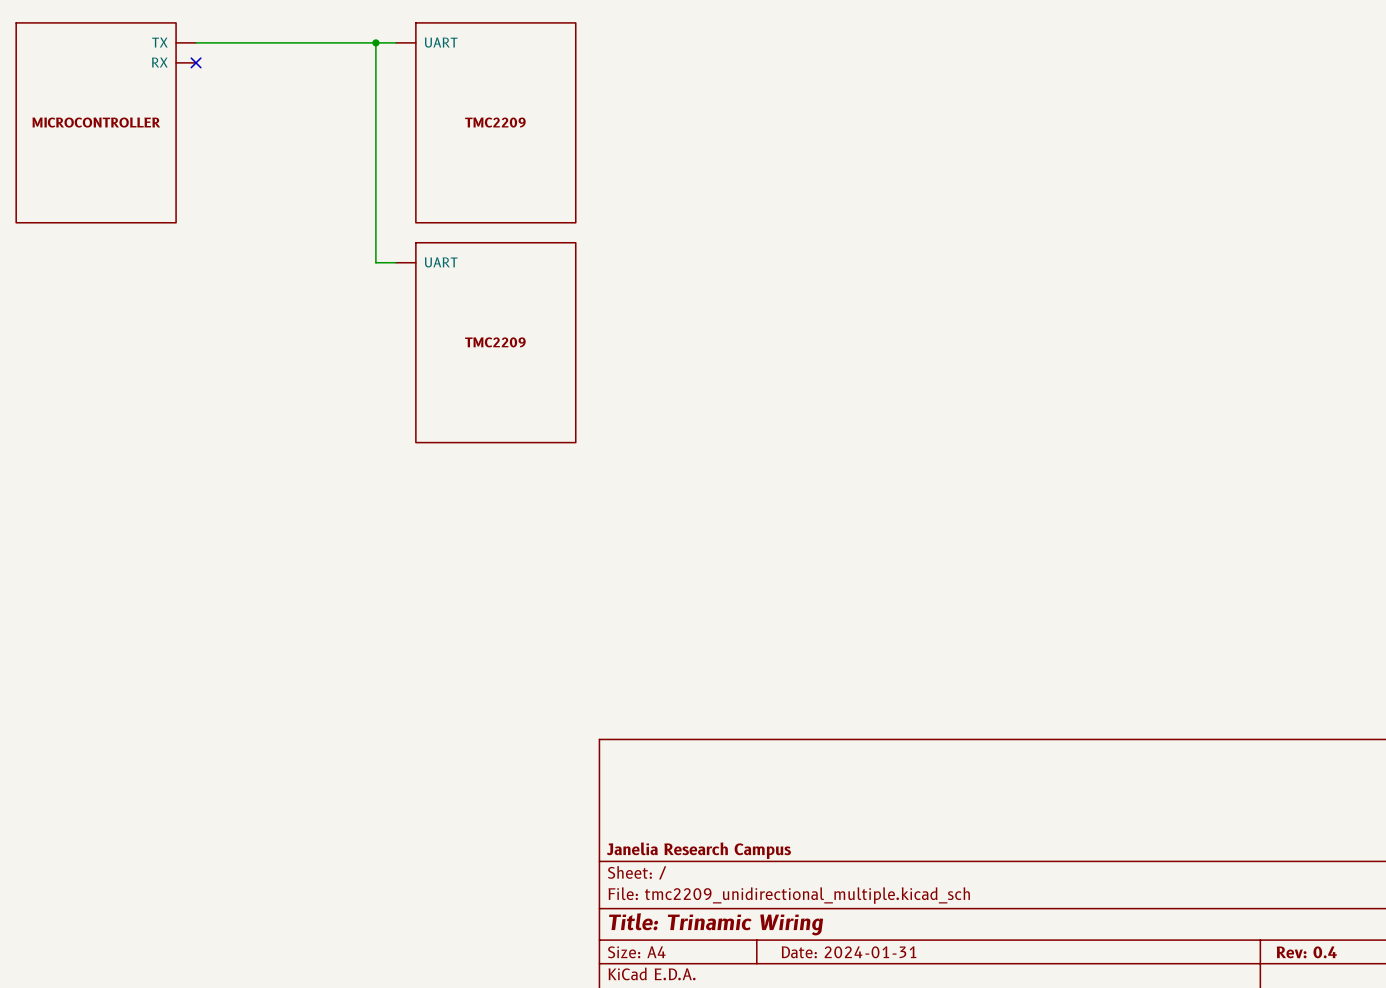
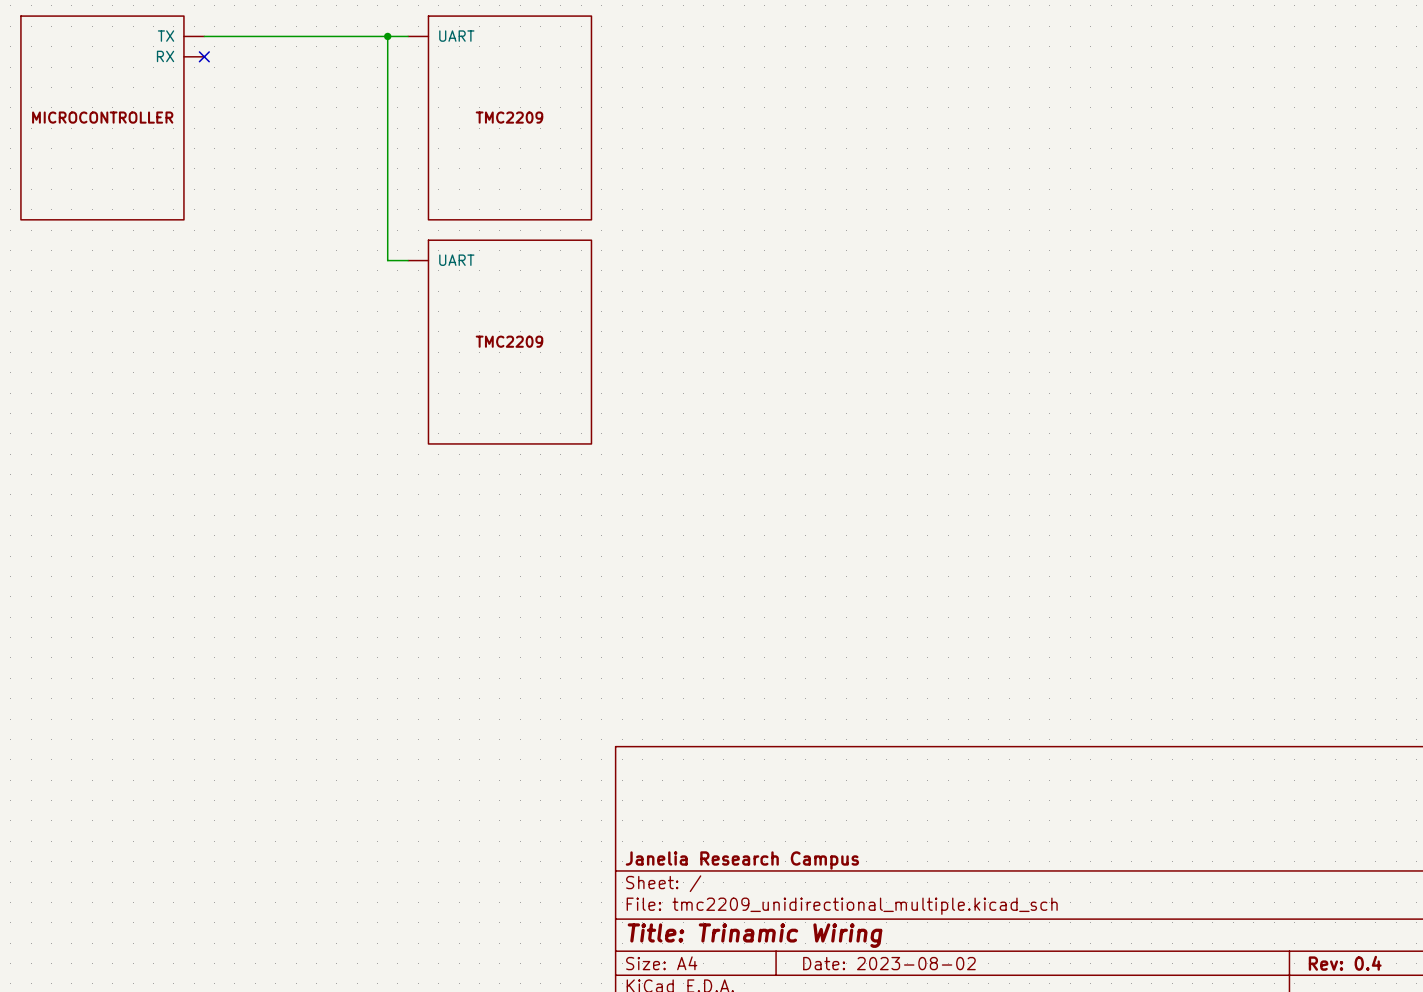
title block: Date: 2024-01-31 (849, 952) -> Date: 2023-08-02 (889, 963)

